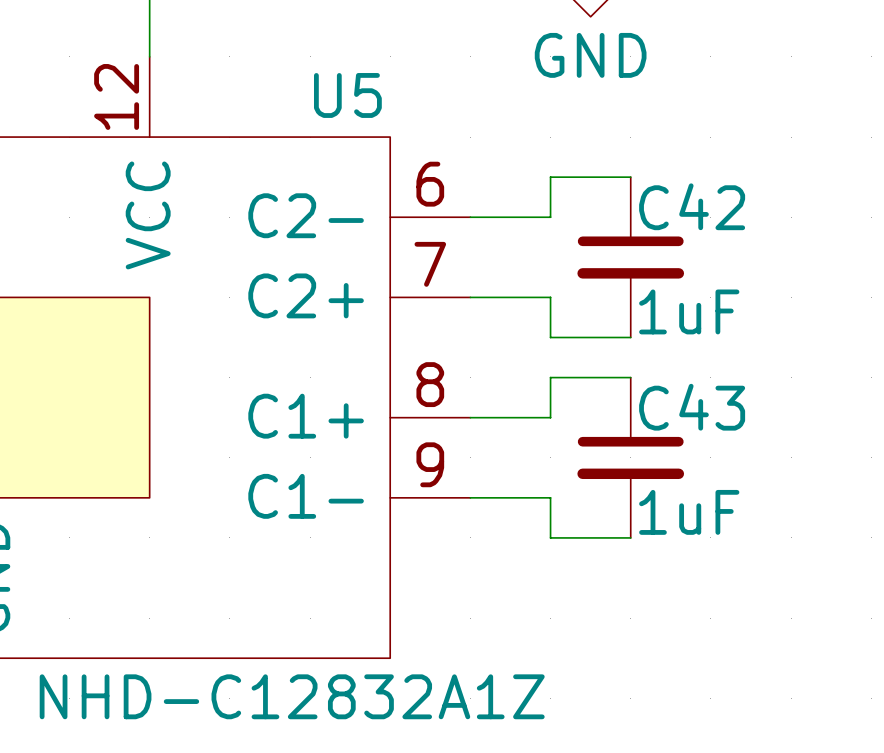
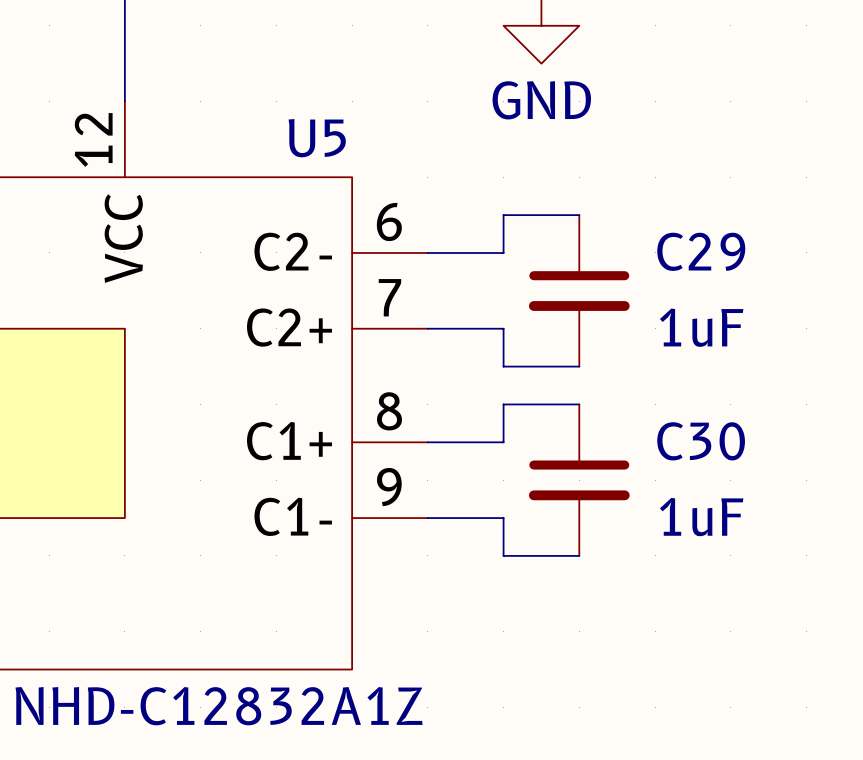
C42 name: C42 (692, 206) -> C29 (701, 251)
C42 value position: 1uF (689, 311) -> 1uF (701, 327)
C43 name: C43 (692, 407) -> C30 (701, 441)
C43 value position: 1uF (689, 512) -> 1uF (701, 517)

